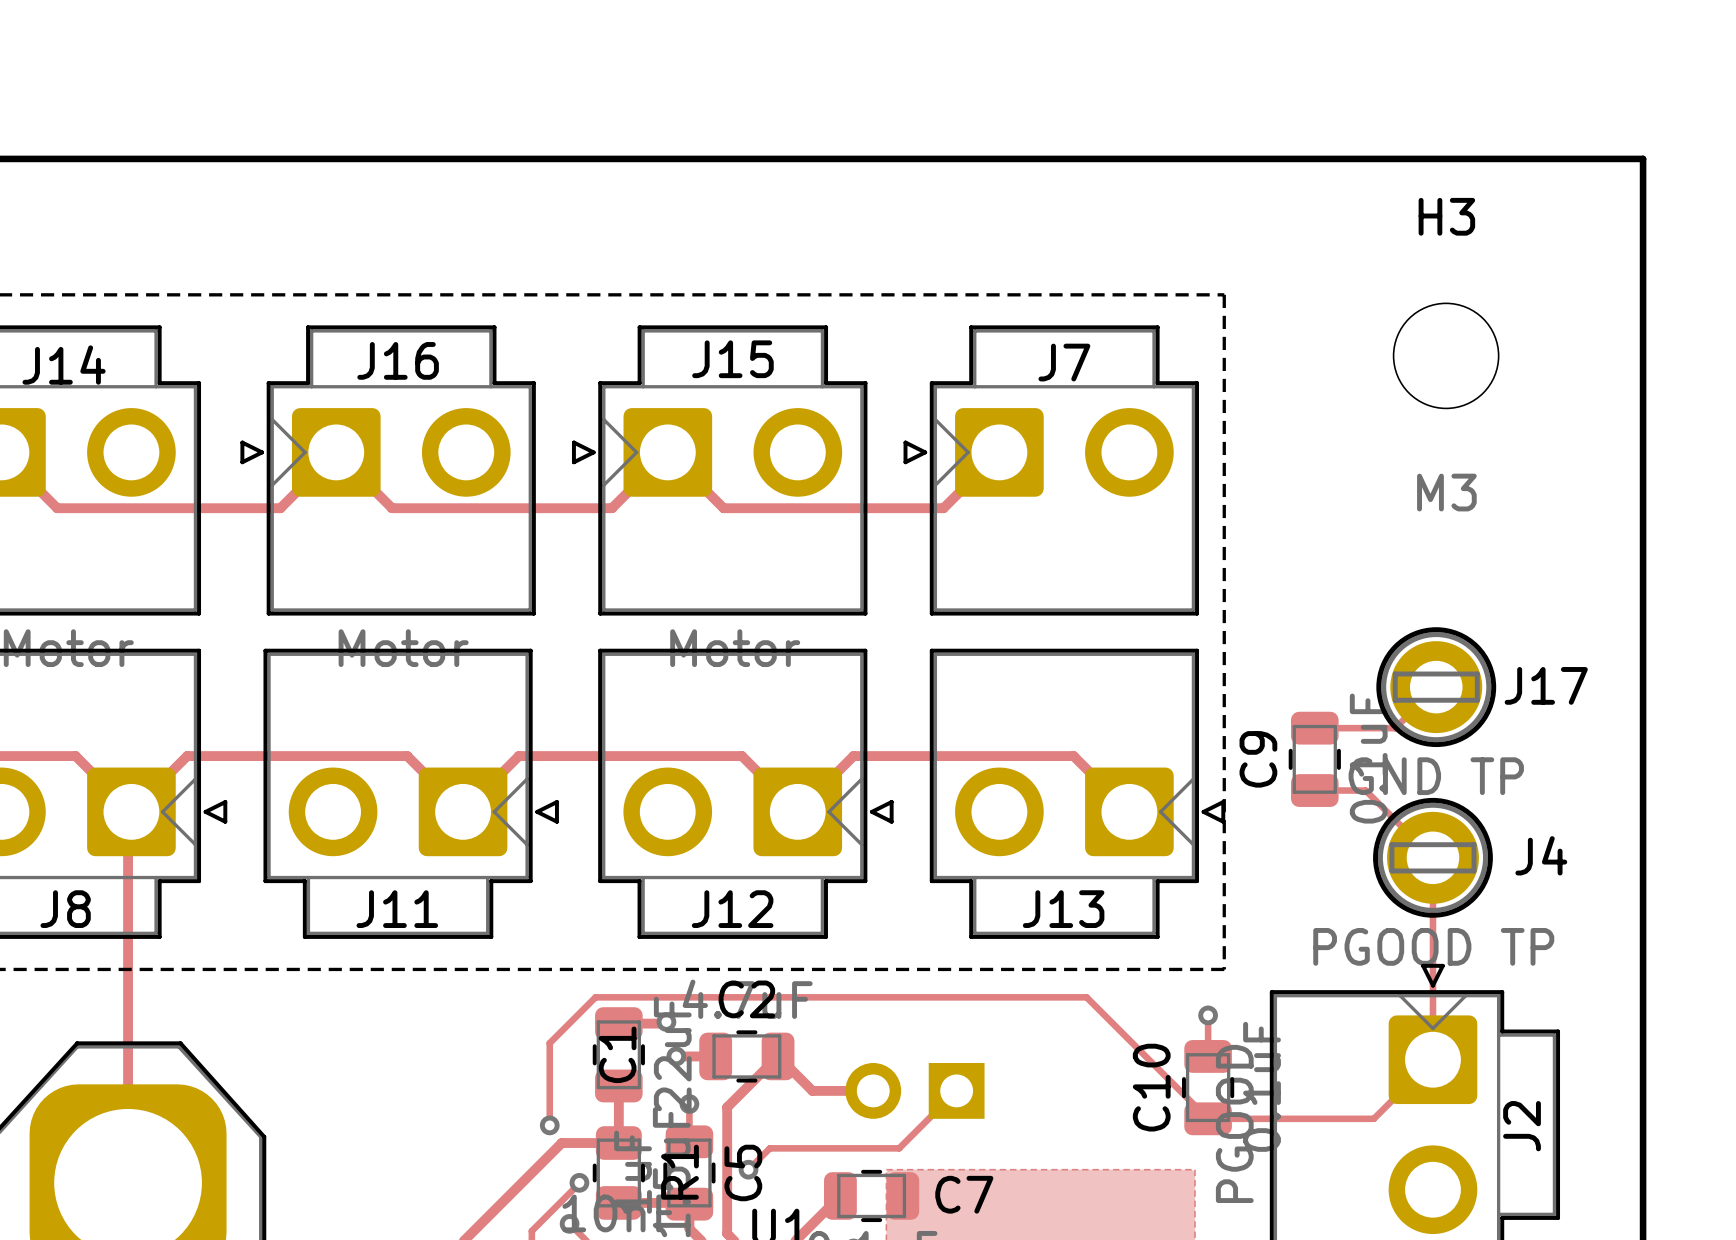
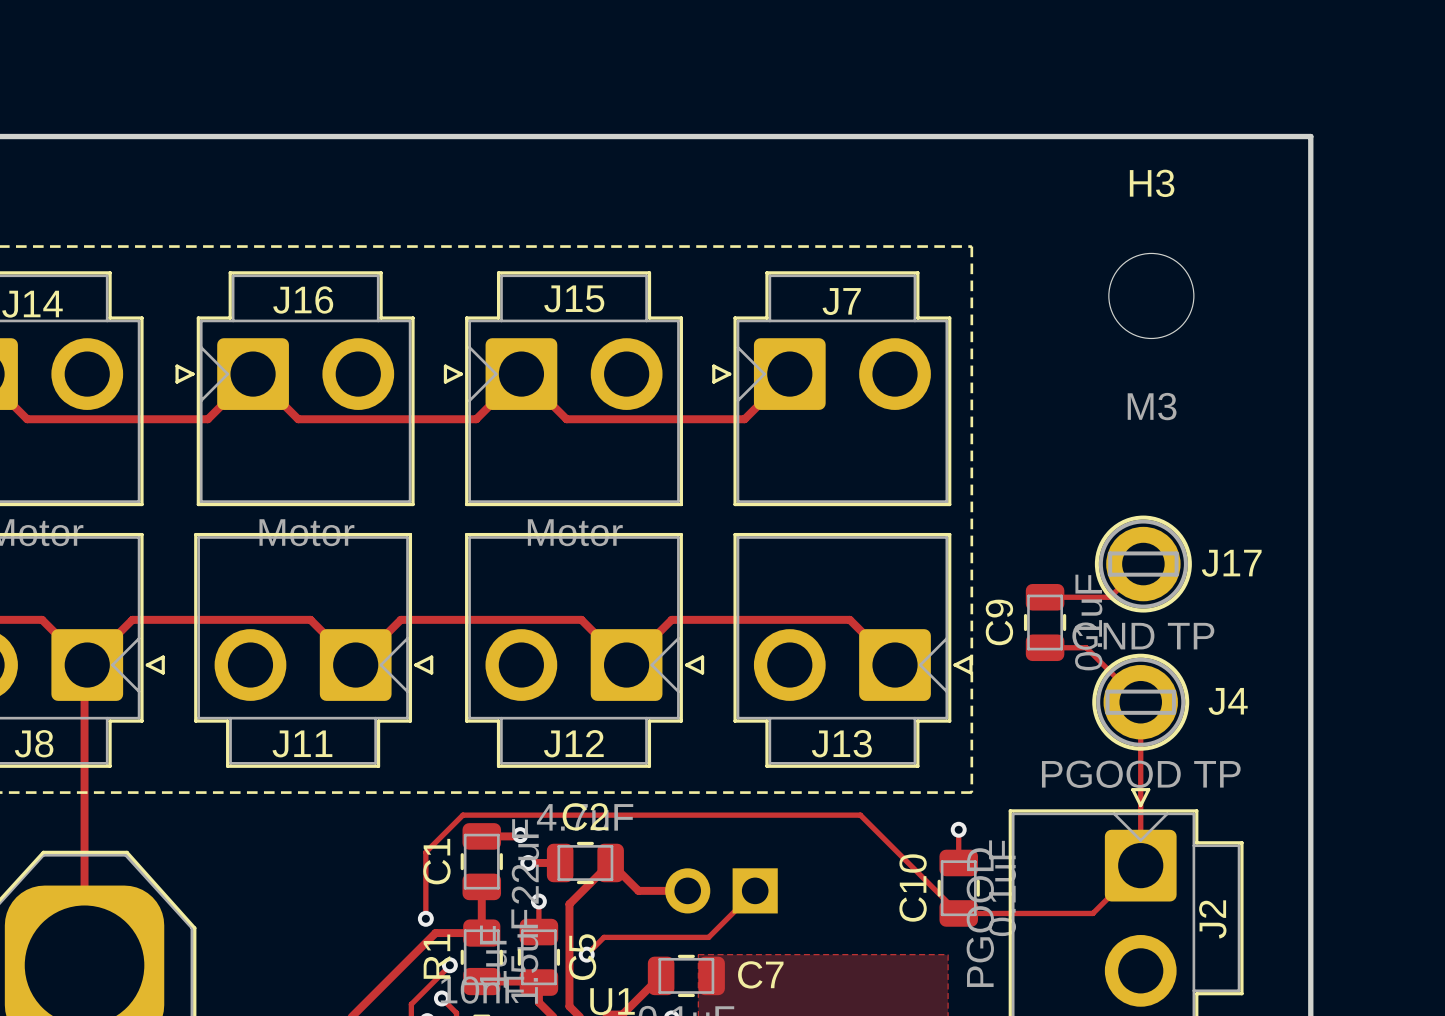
C1 name position: C1 (617, 1054) -> C1 (436, 861)
R1 name position: R1 (679, 1172) -> R1 (436, 956)

